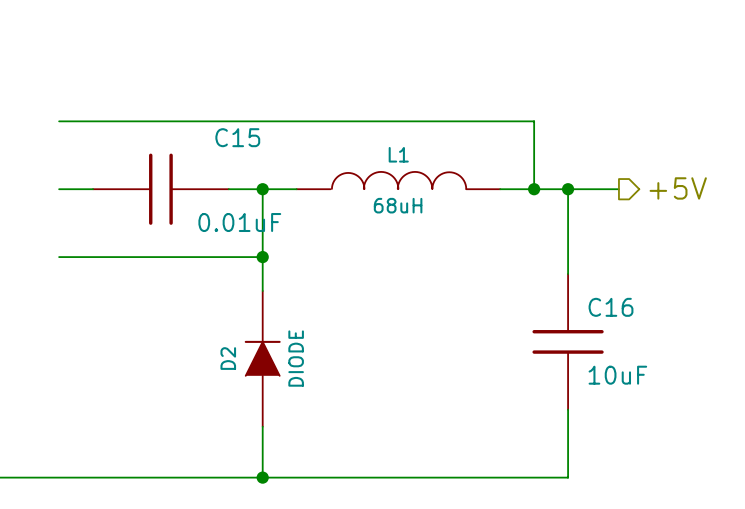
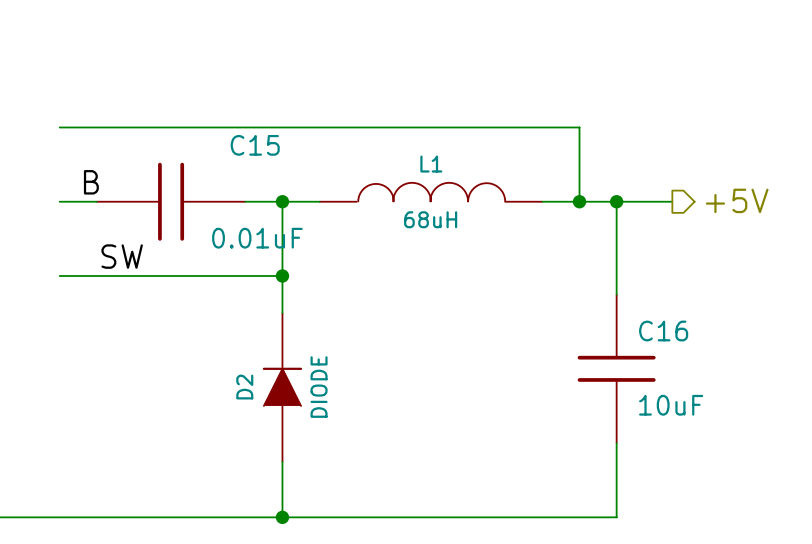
label: none -> B (91, 182)
label: none -> SW (122, 256)

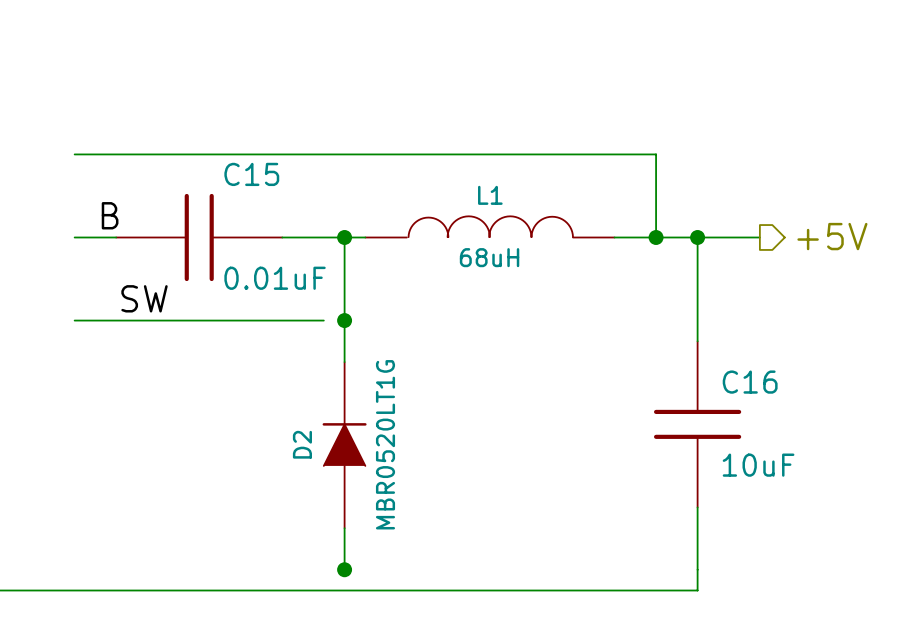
C15 name position: C15 (255, 145) -> C15 (251, 174)
wire: (282, 201) (282, 313) -> (344, 237) (344, 362)
junction position: (282, 201) -> (344, 237)
C15 value position: 0.01uF (257, 238) -> 0.01uF (275, 278)
junction position: (282, 276) -> (344, 320)
D2 position: (282, 387) -> (344, 445)
D2 value: DIODE (319, 387) -> MBR0520LT1G (385, 444)
wire: (282, 461) (282, 517) -> none
wire: none -> (344, 528) (344, 569)
junction position: (282, 517) -> (344, 569)

